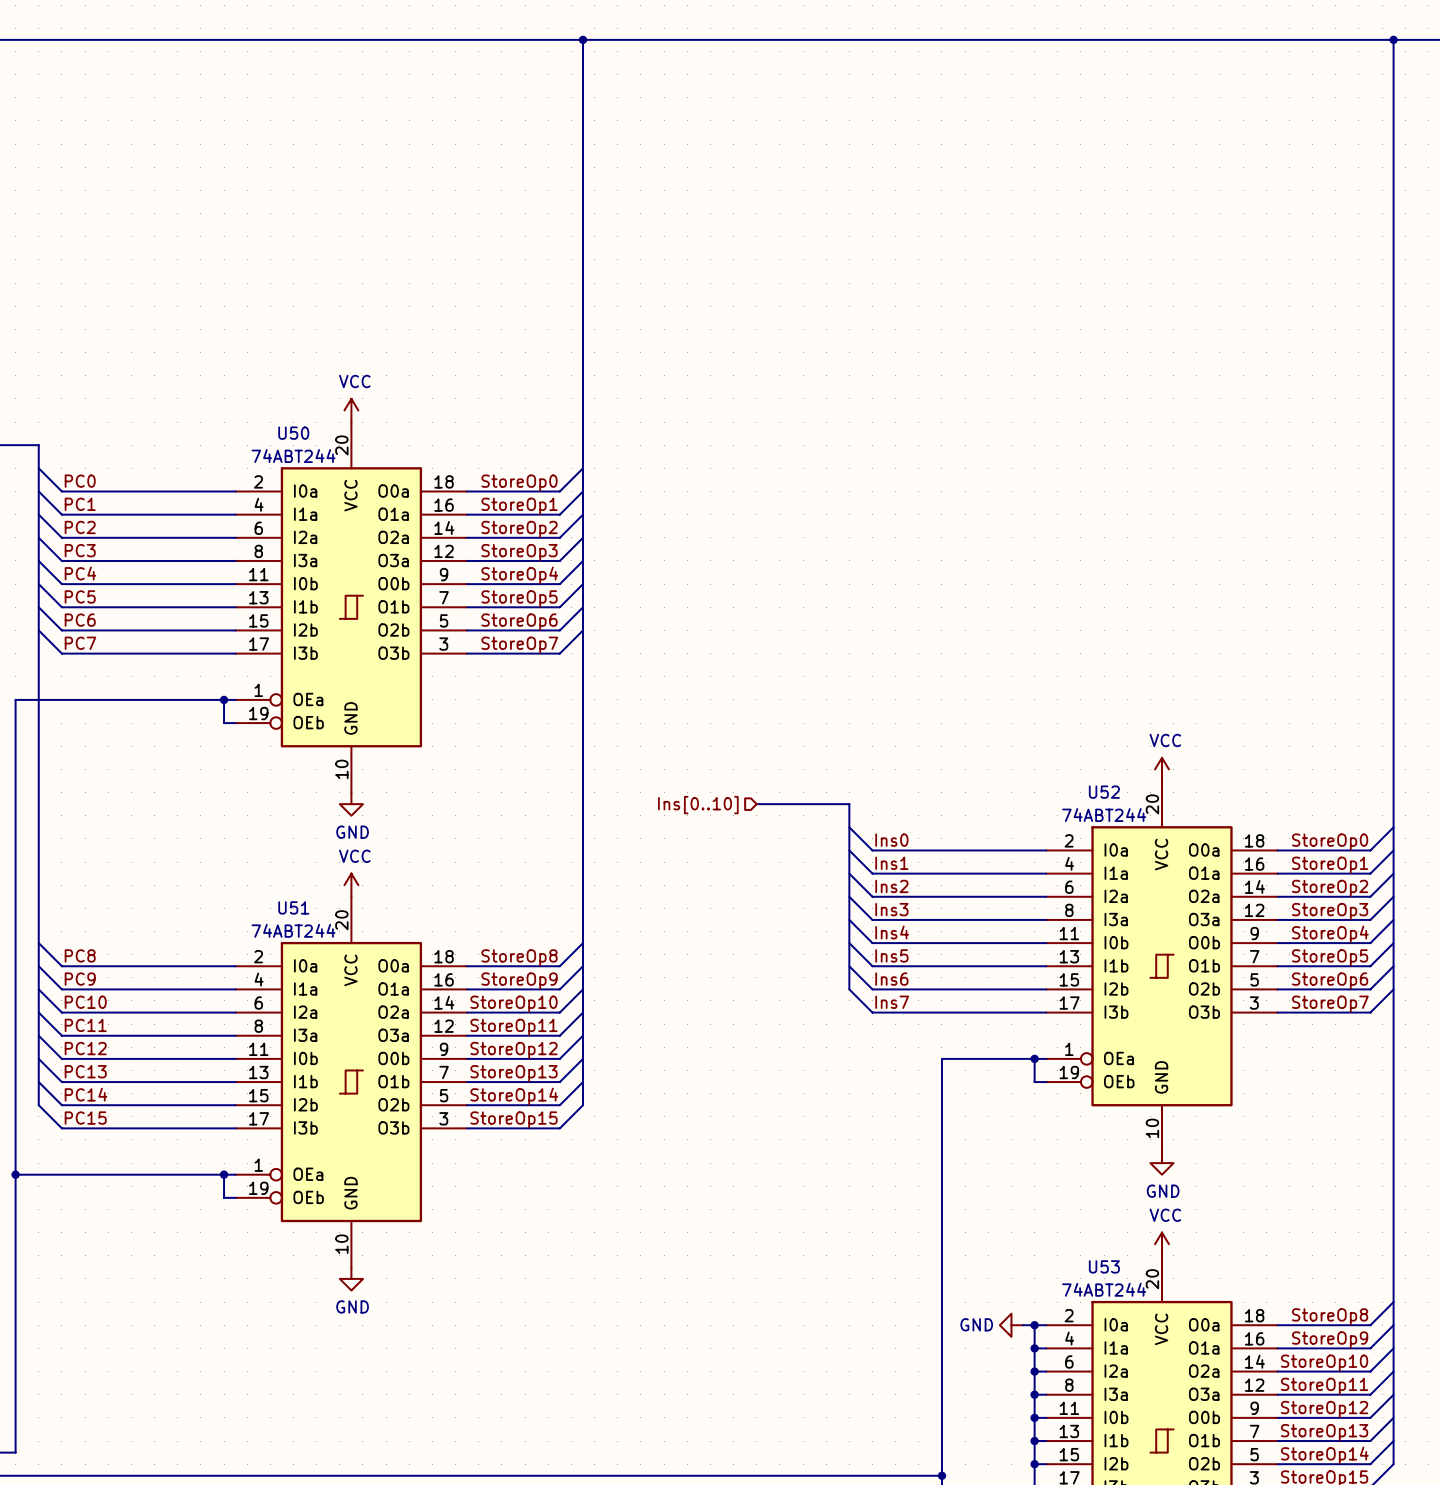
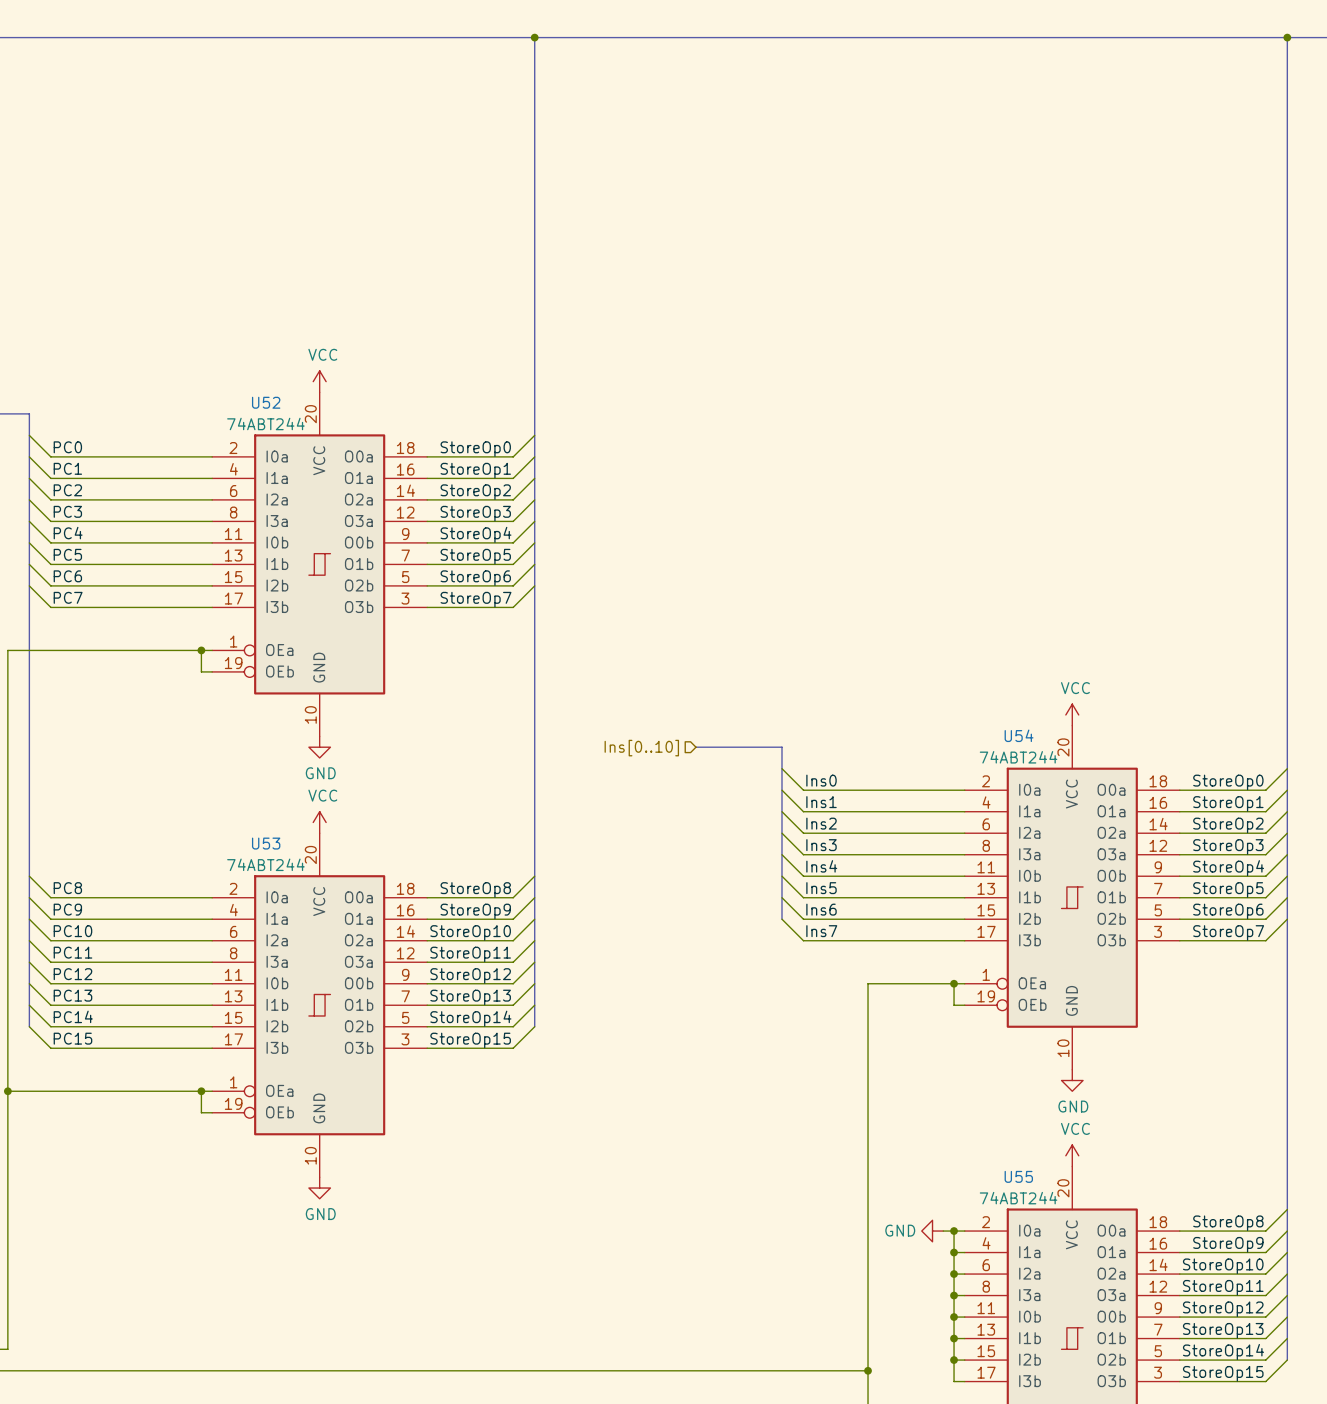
U50 name: U50 (293, 433) -> U52 (266, 402)
U52 name: U52 (1104, 792) -> U54 (1019, 735)
U51 name: U51 (293, 907) -> U53 (266, 843)
U53 name: U53 (1104, 1266) -> U55 (1018, 1176)

